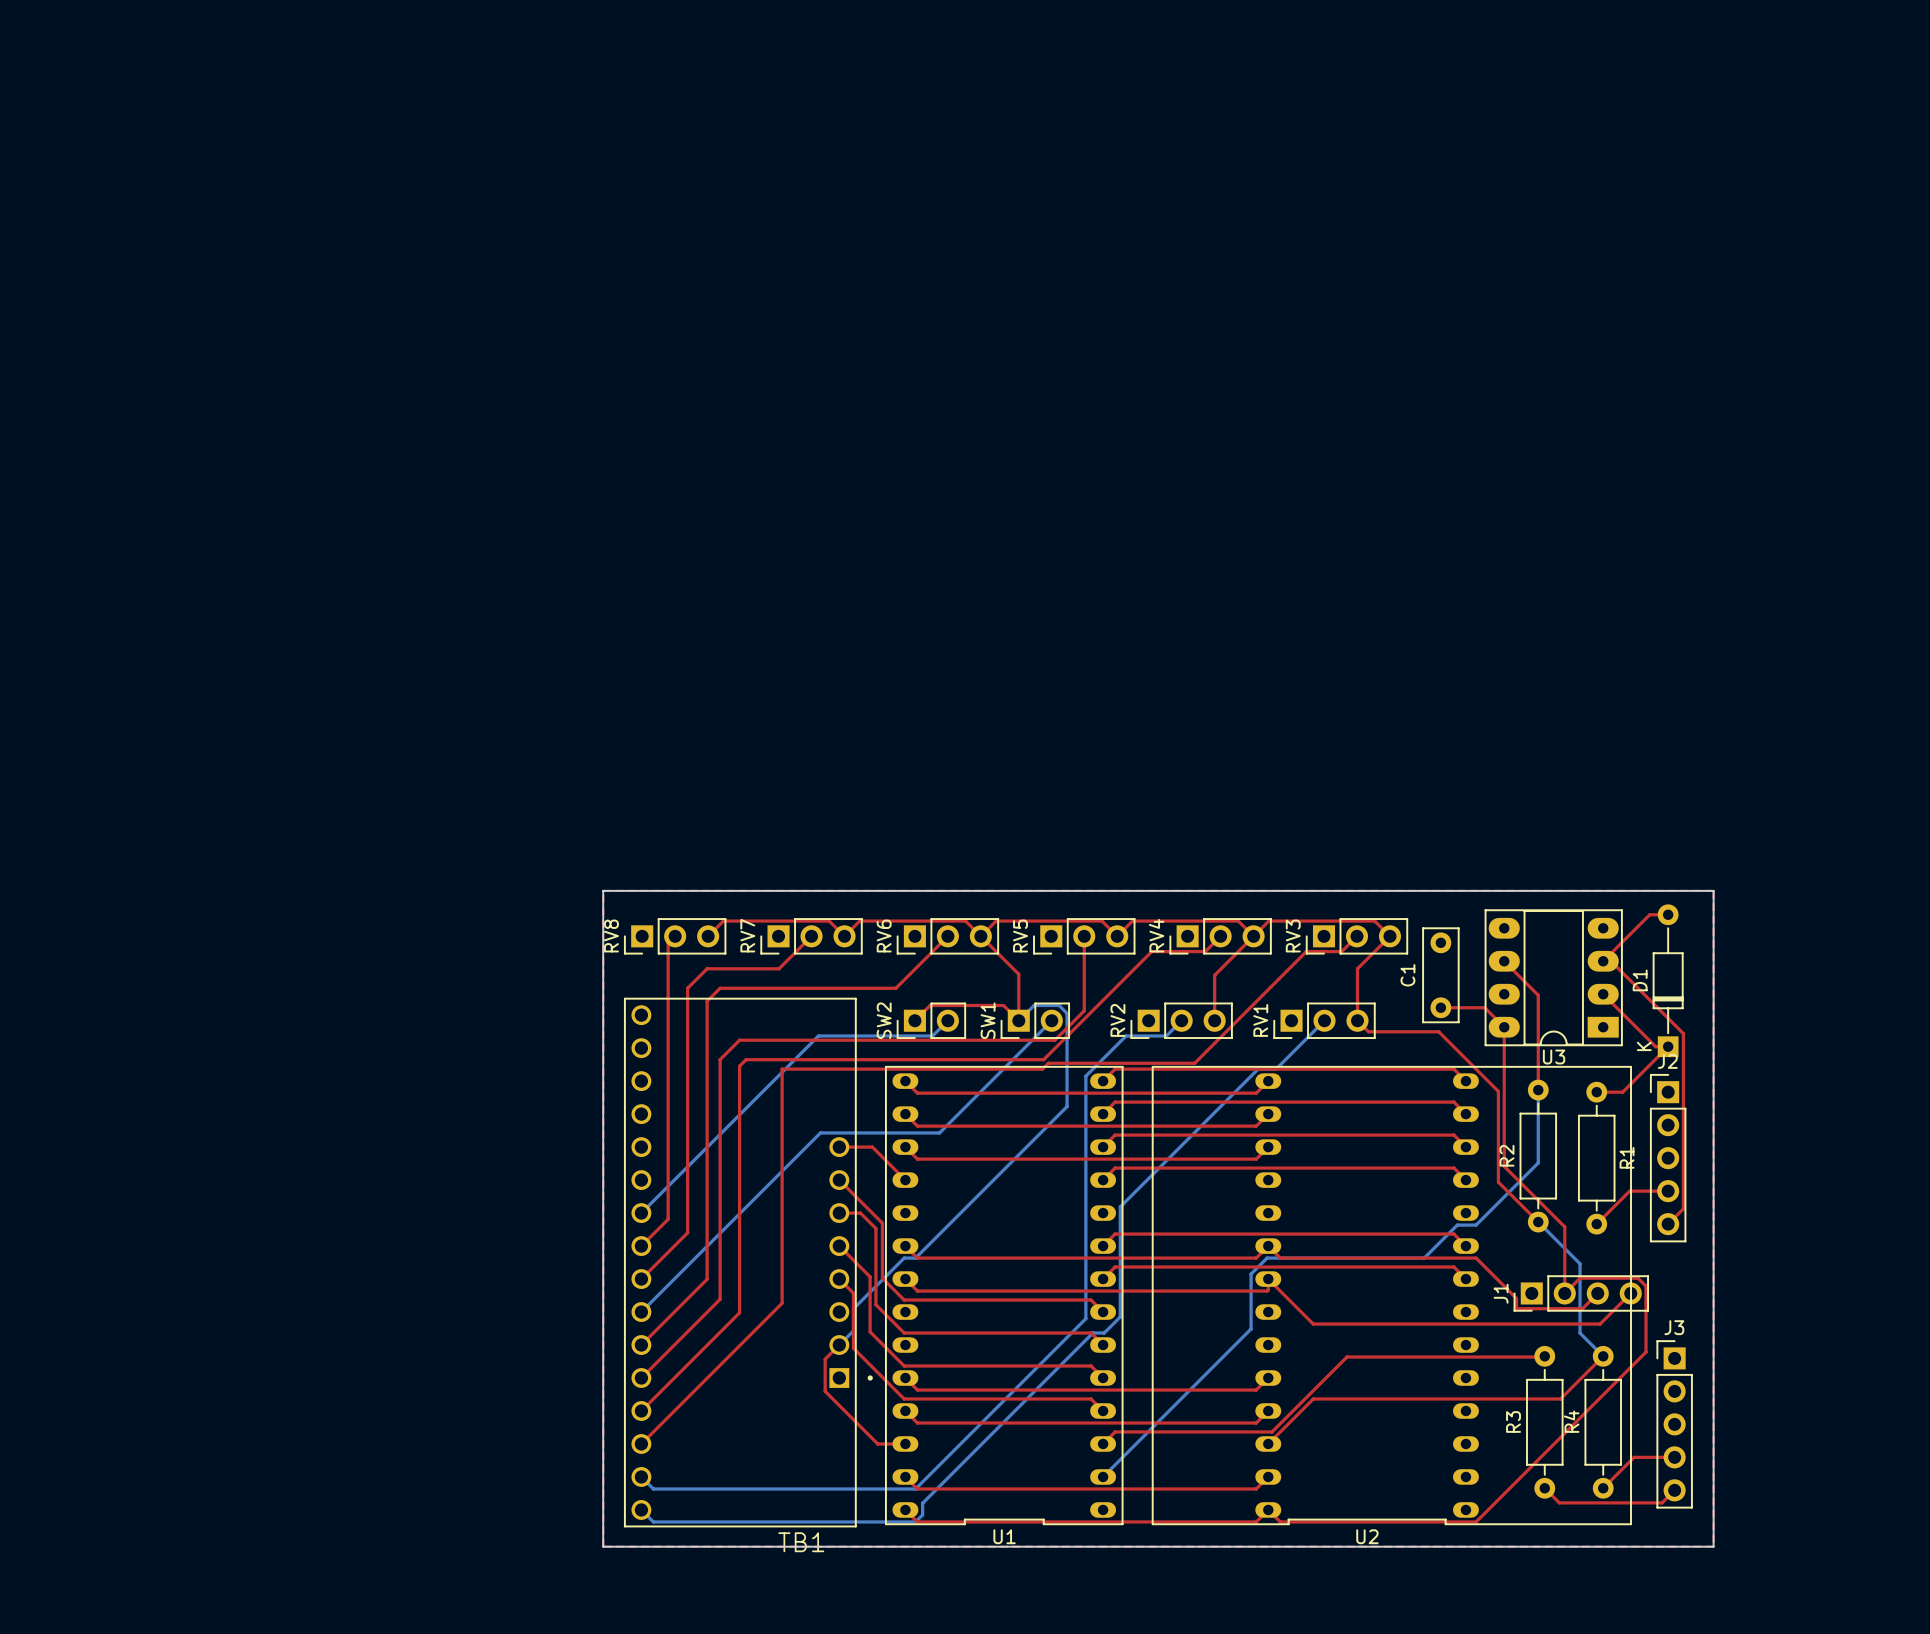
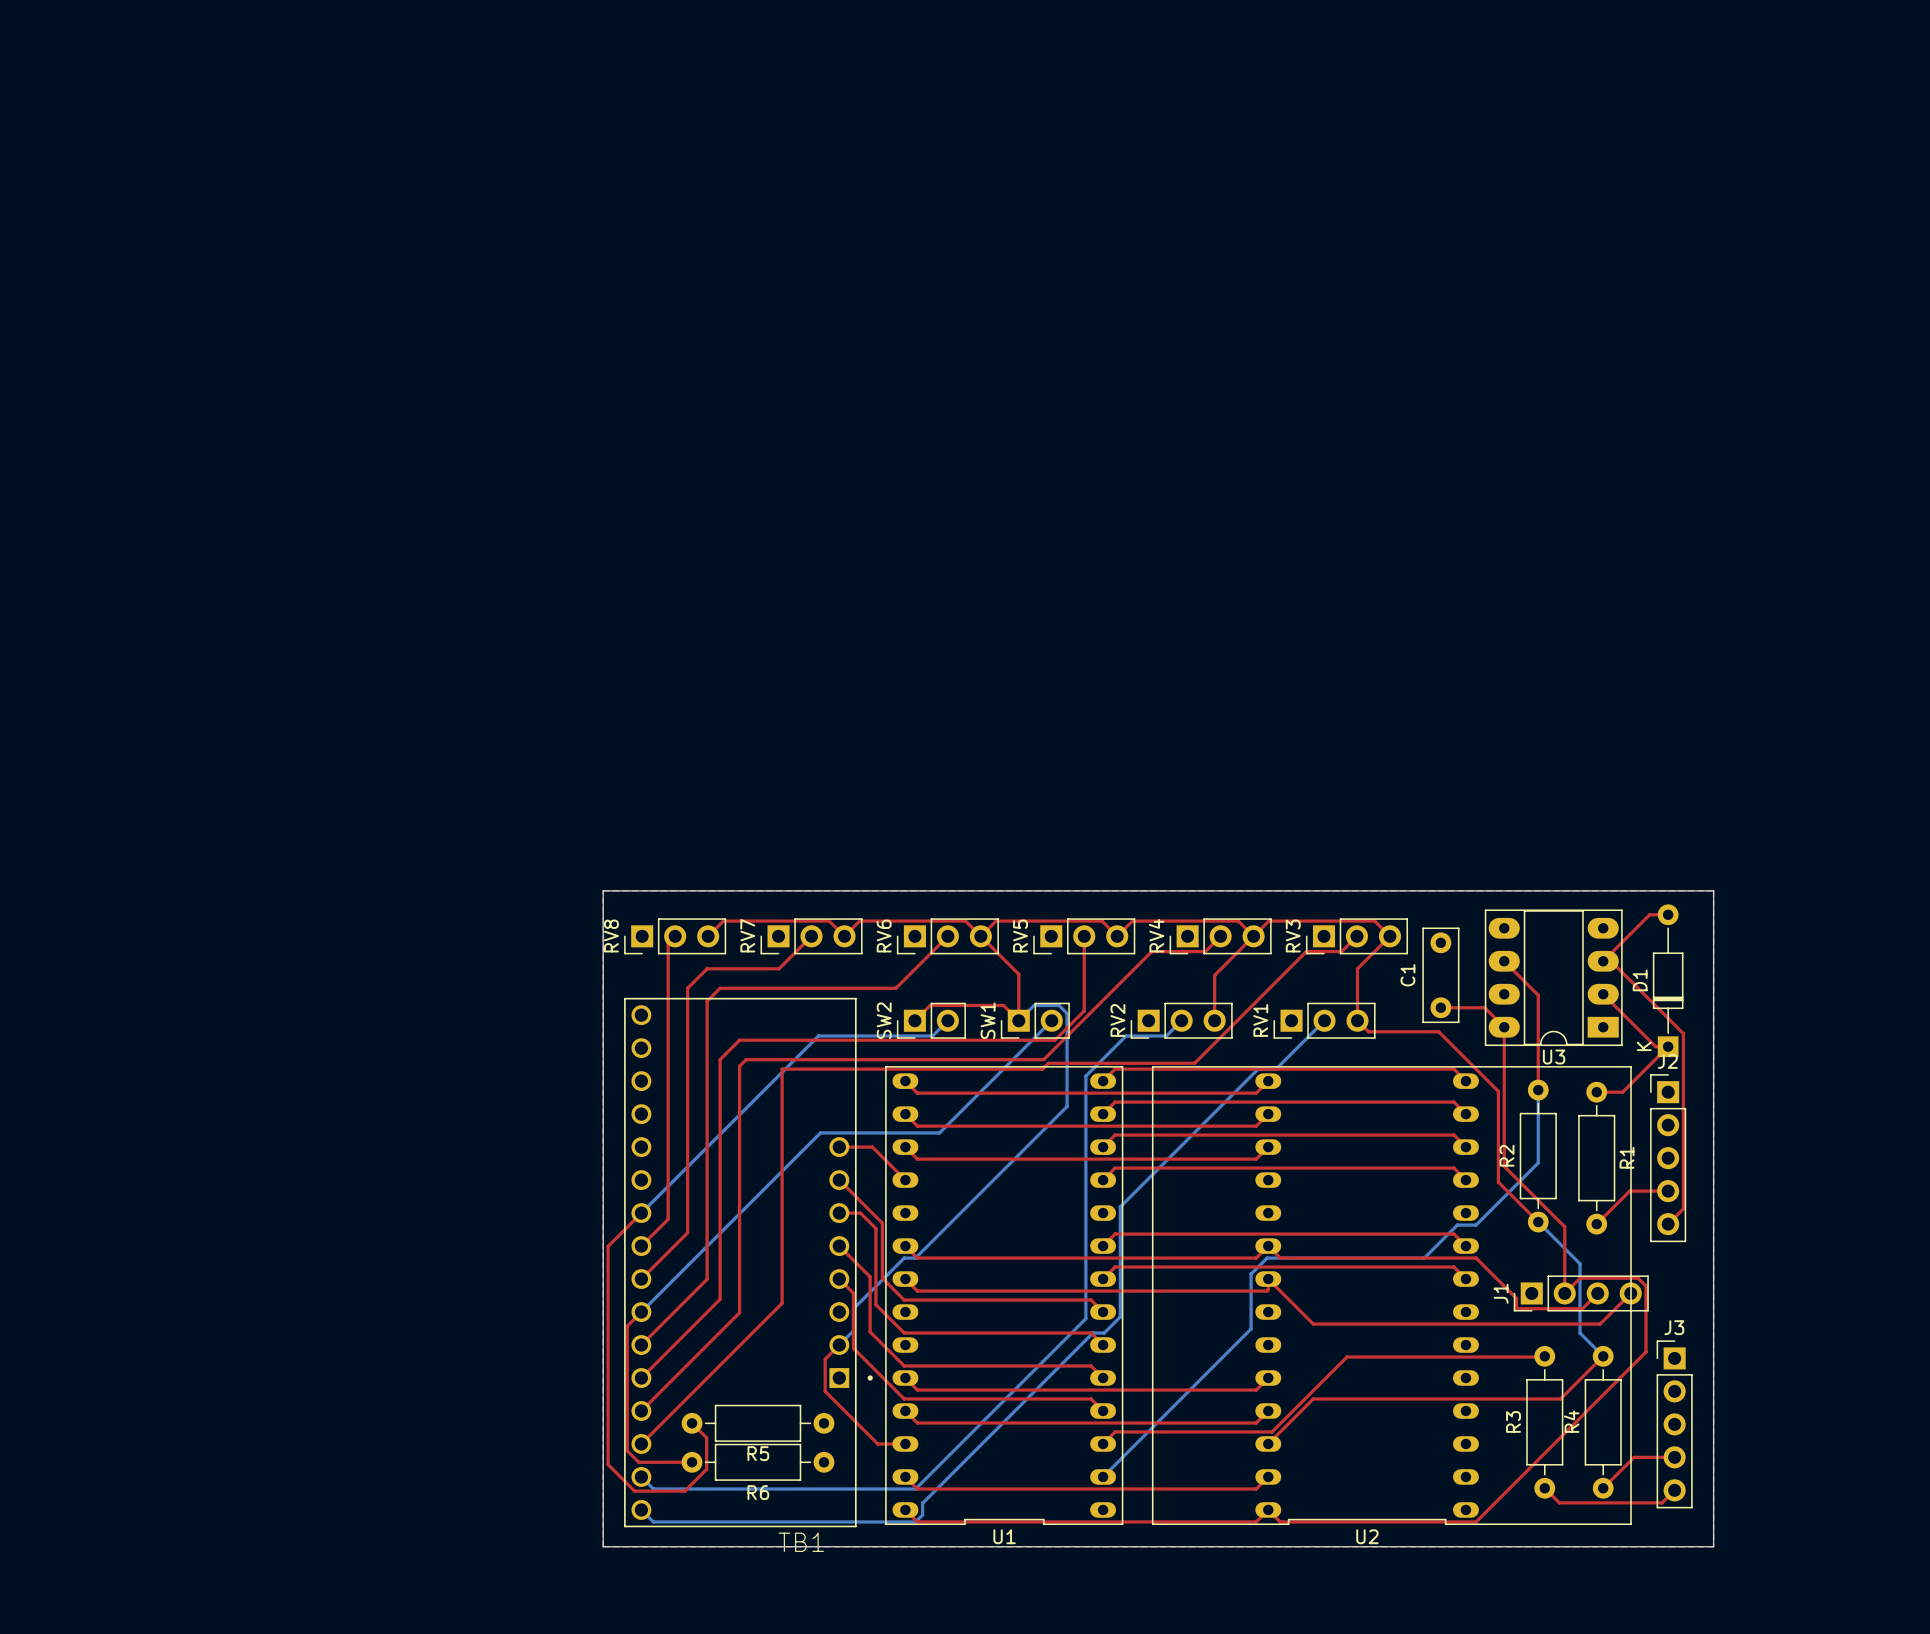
top track: none -> (641, 1213) (608, 1246) (608, 1464) (634, 1491) (684, 1491) (706, 1469) (706, 1437) (692, 1423)
top track: none -> (641, 1312) (627, 1326) (627, 1450) (638, 1462) (692, 1462)
R5: none -> (758, 1423)
R6: none -> (758, 1462)

